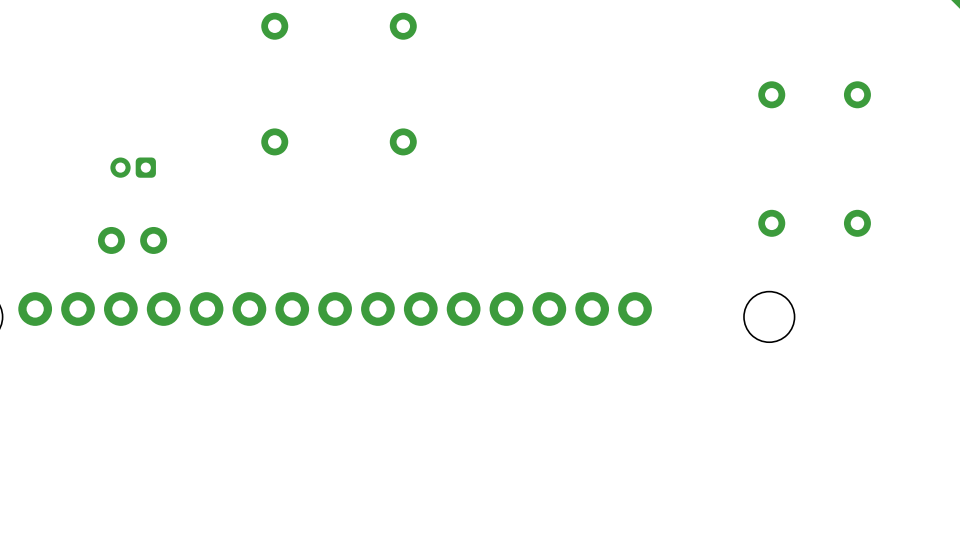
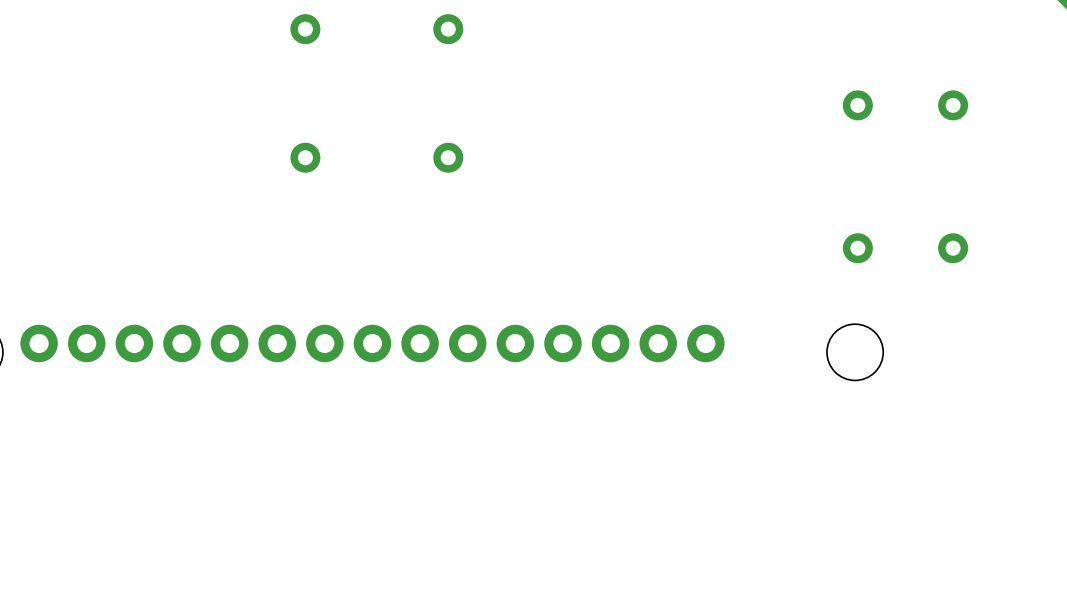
part: (133, 167) -> none
part: (132, 240) -> none

